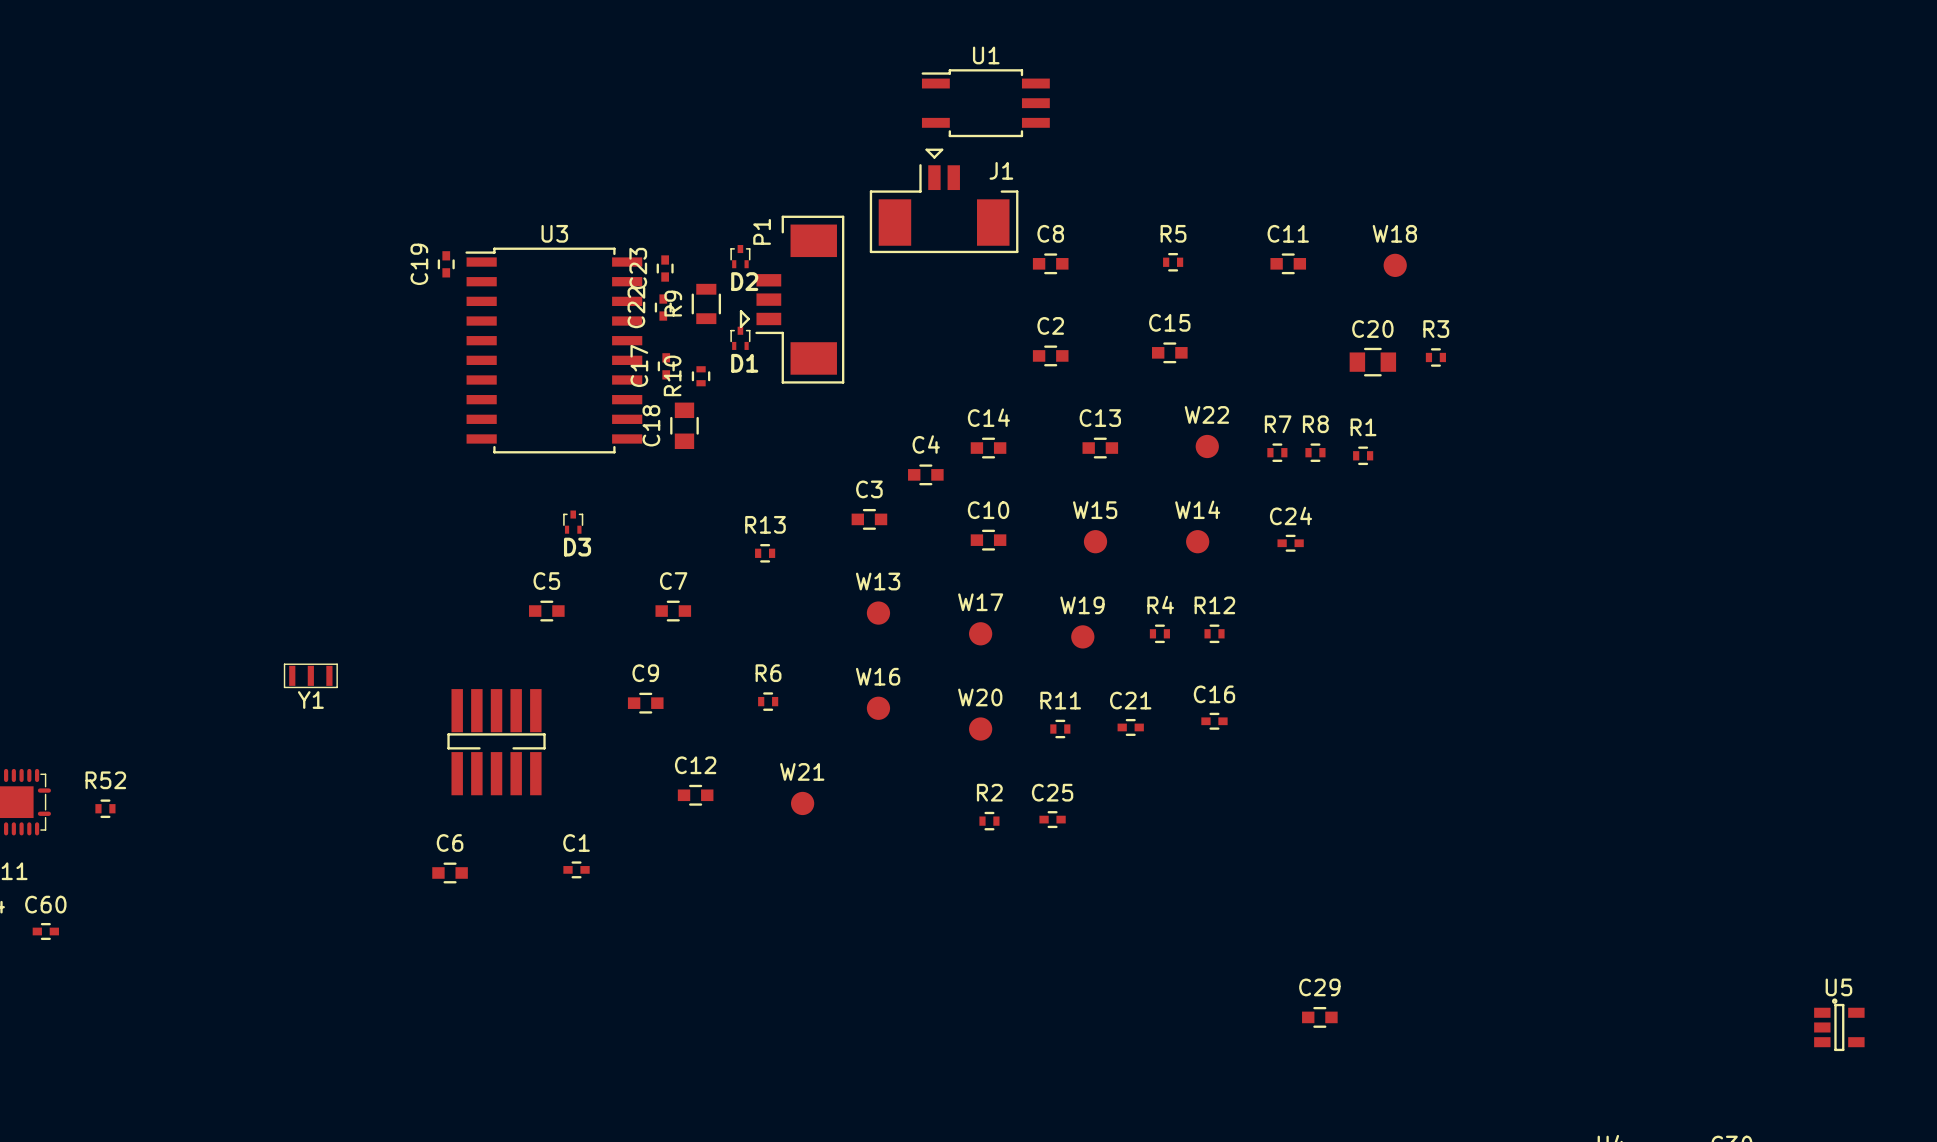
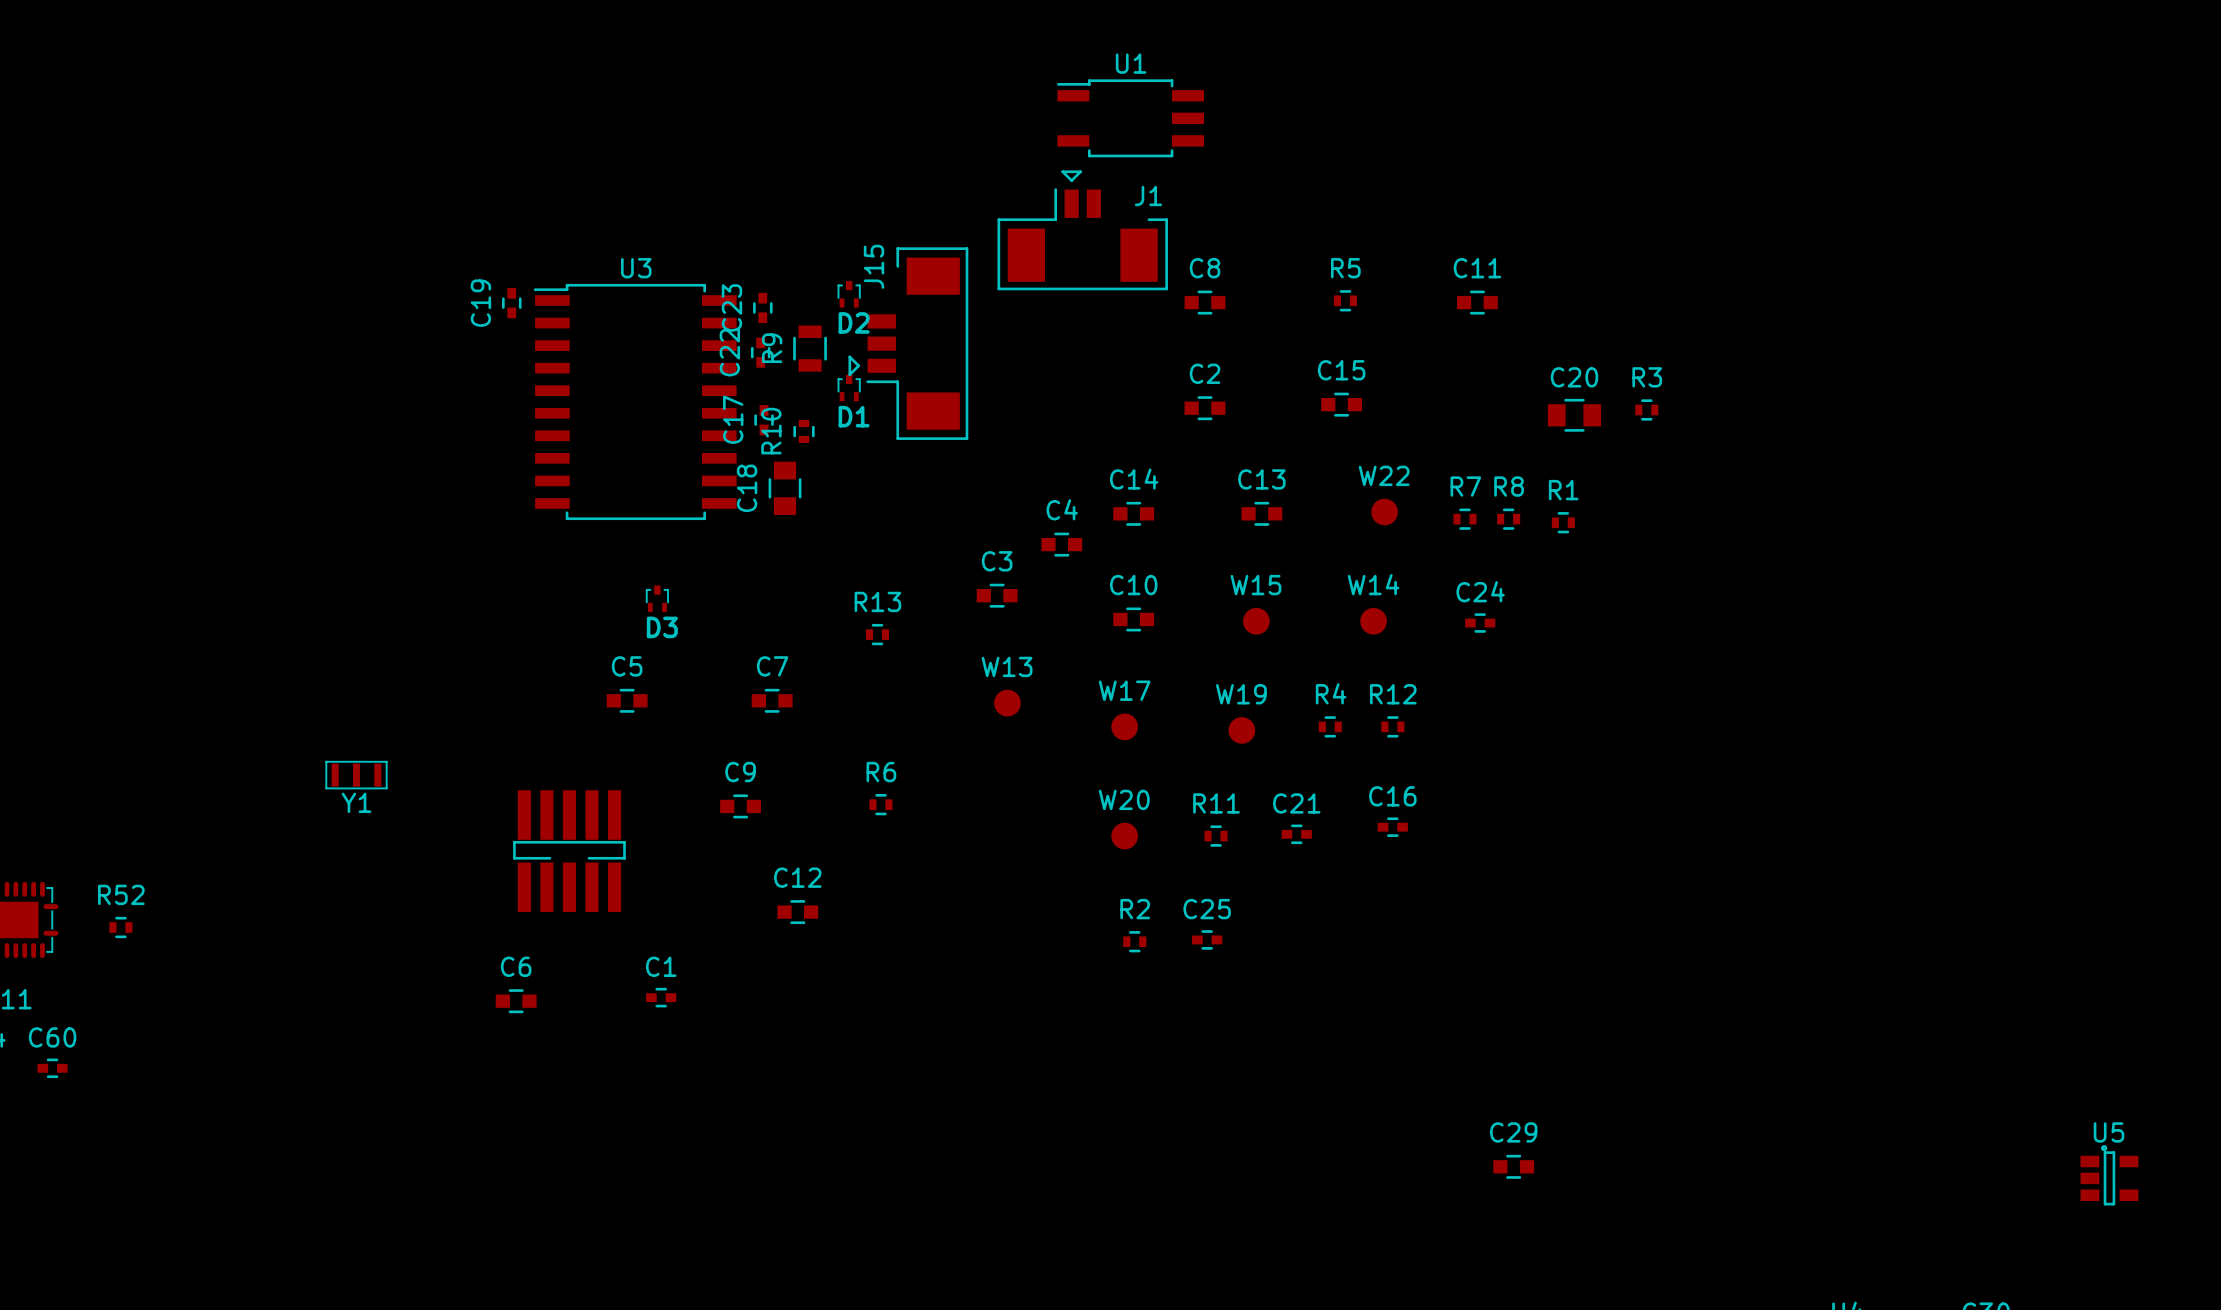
P1 name: P1 (762, 231) -> J15 (874, 266)
W18: (1395, 265) -> none
W16: (878, 708) -> none
W21: (802, 803) -> none

